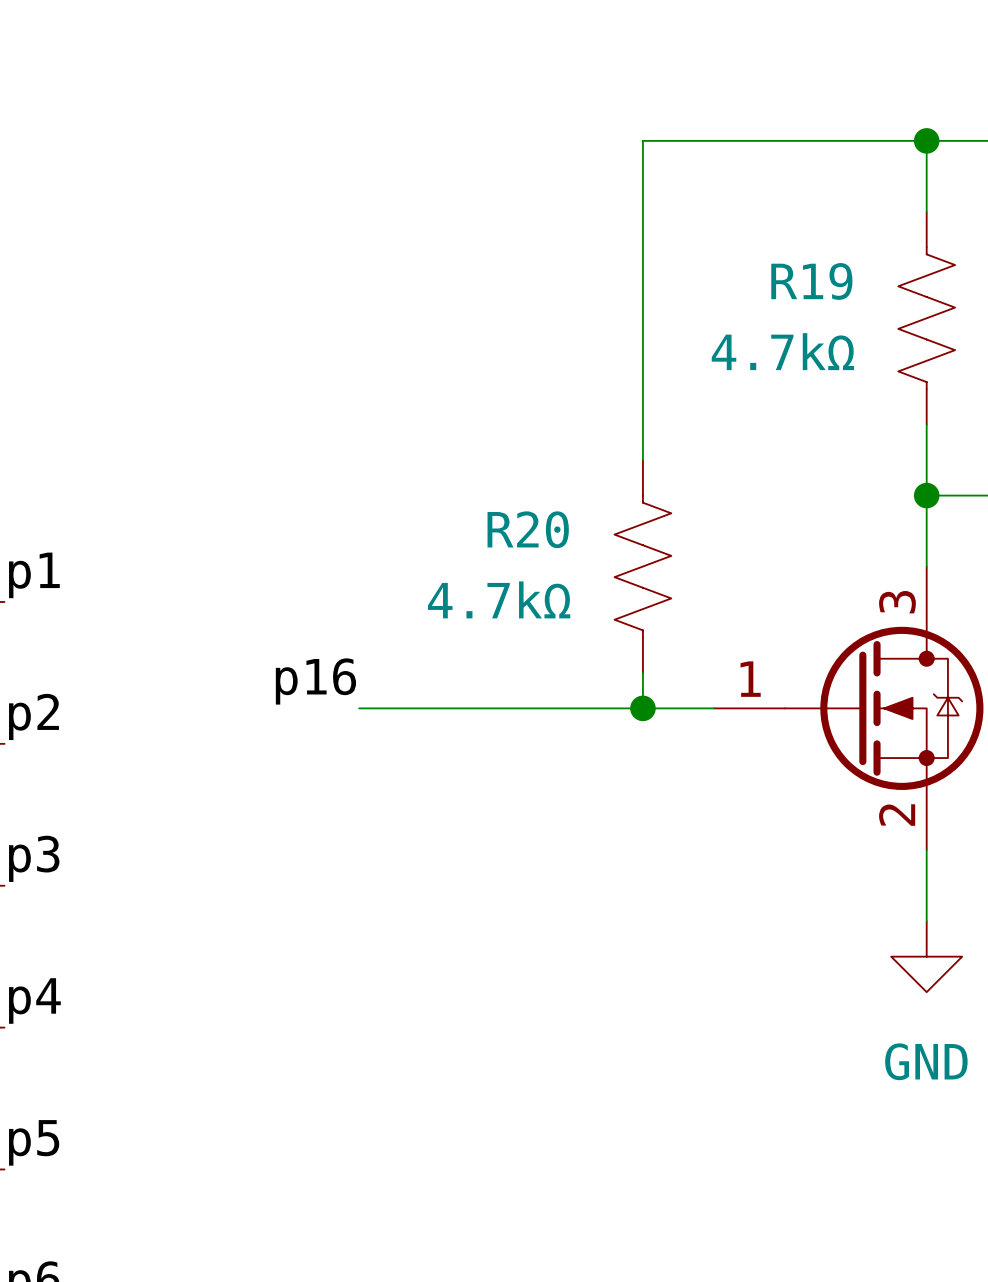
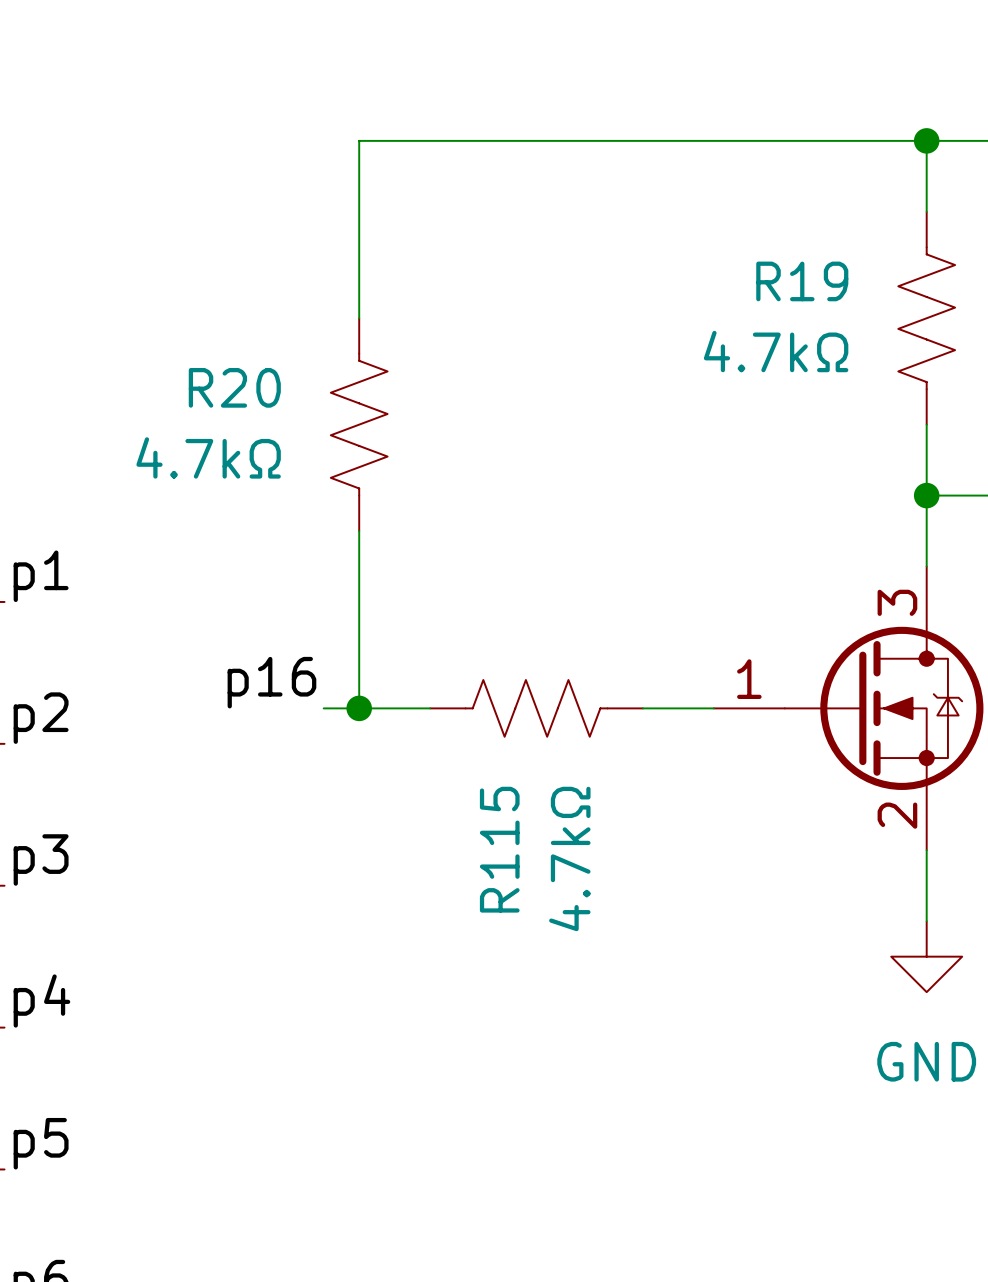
wire: (642, 140) (642, 460) -> (642, 140) (359, 140) (359, 318)
wire: none -> (359, 531) (359, 708) (323, 708)
R20 position: (642, 566) -> (359, 424)
wire: (642, 672) (642, 708) (430, 708) -> none
label position: p16 (315, 681) -> p16 (271, 682)
junction: none -> (359, 708)
R115: none -> 4.7kΩ (536, 708)
junction: (642, 708) -> none

